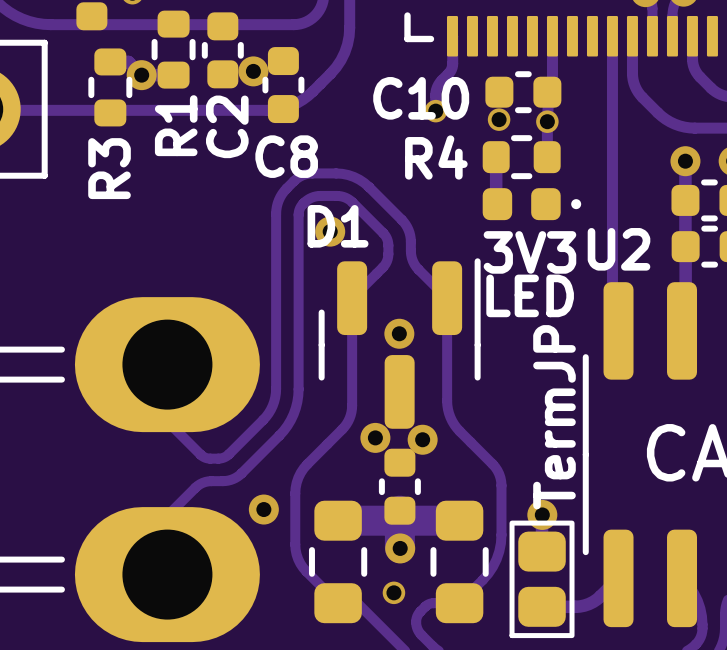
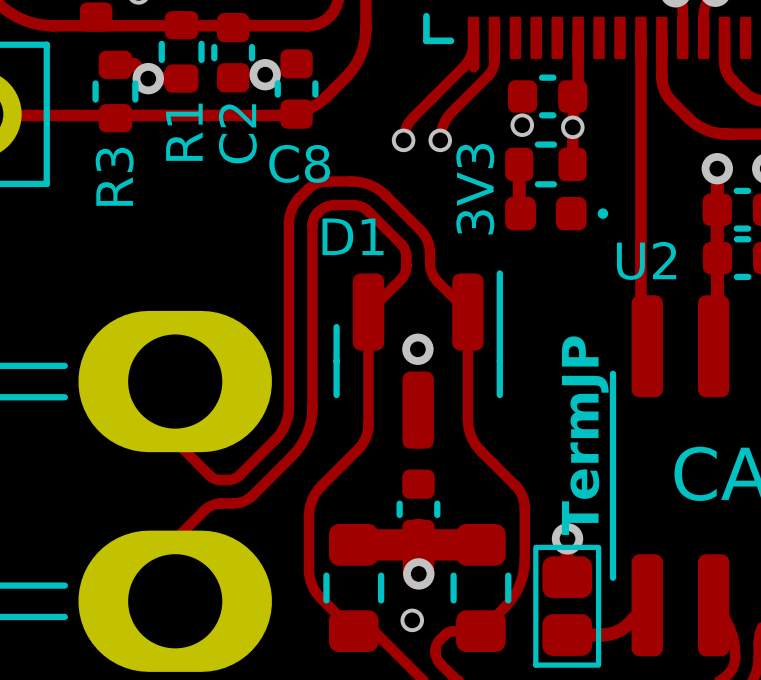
track: none -> (494, 37) (494, 63) (491, 71) (448, 115) (441, 130) (440, 140)
track: none -> (473, 42) (467, 62) (410, 120) (404, 132) (403, 140)
track: (452, 63) (450, 70) (437, 87) (435, 111) -> none
C10 name: C10 (421, 98) -> none
via: (435, 111) -> none
via: none -> (403, 140)
via: none -> (440, 140)
R4 name: R4 (436, 157) -> none
via: (330, 231) -> none
part text rotation: 0° (529, 252) -> 90° counterclockwise (475, 189)
part text: LED (530, 295) -> none
via: (375, 437) -> none
via: (422, 439) -> none
via: (263, 509) -> none

